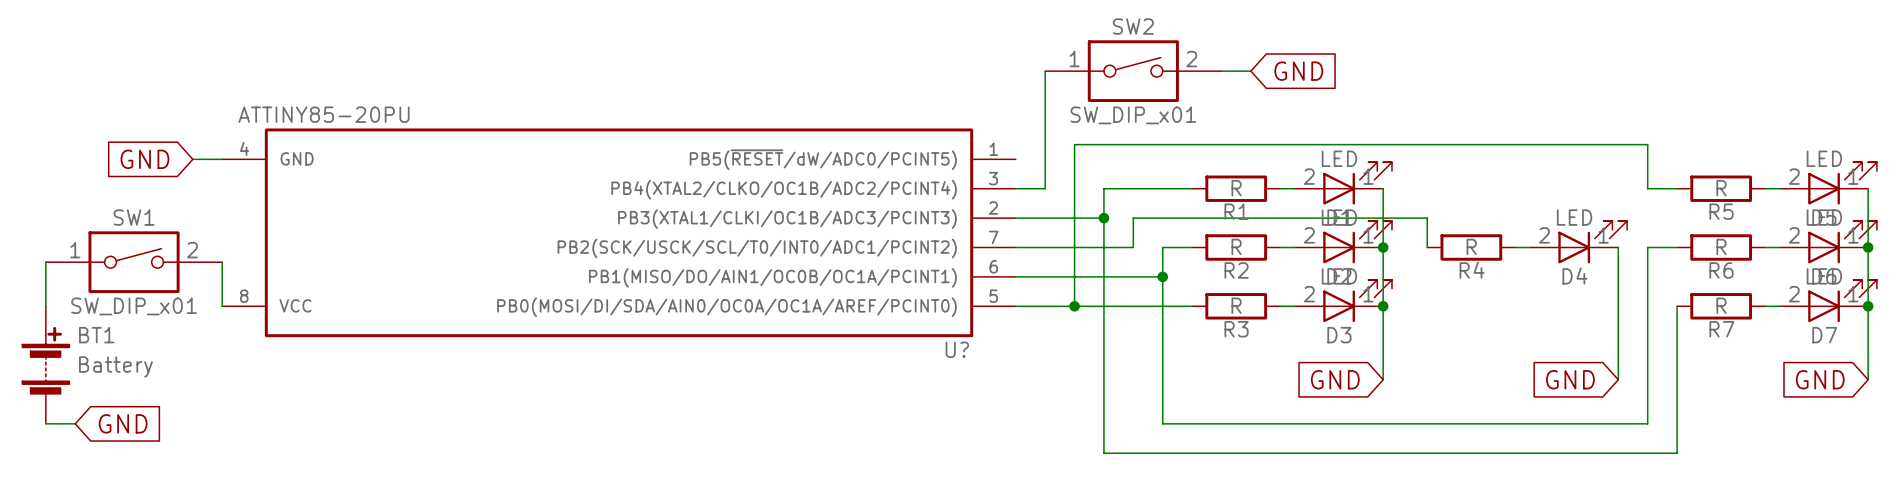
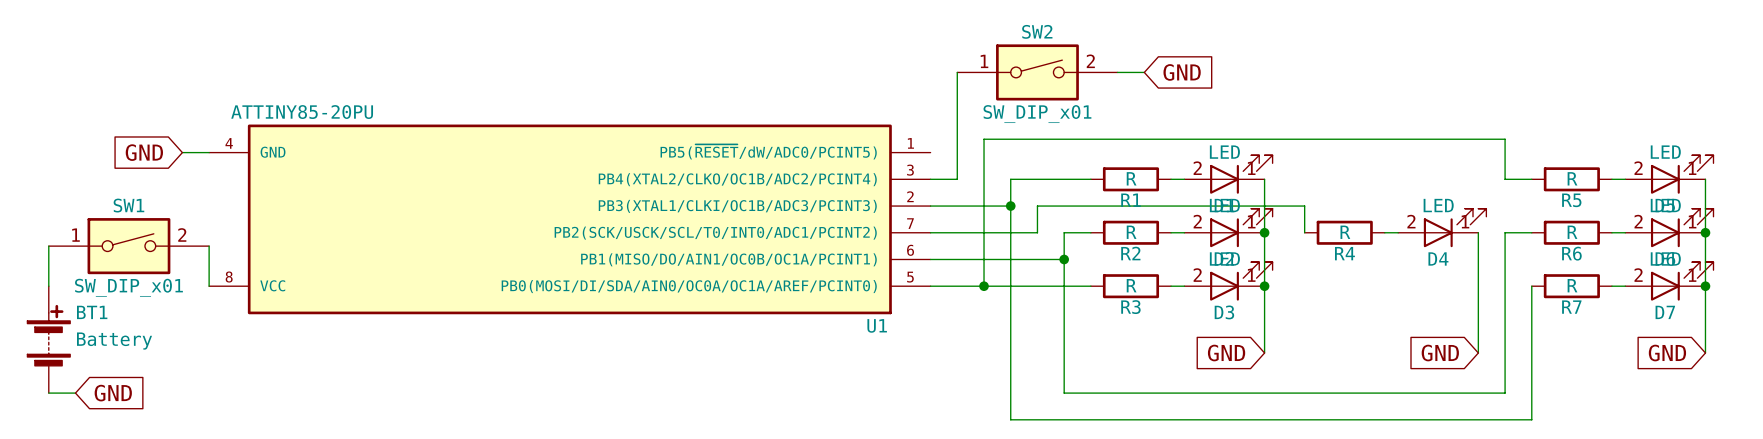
U? name: U? (957, 349) -> U1 (877, 325)

